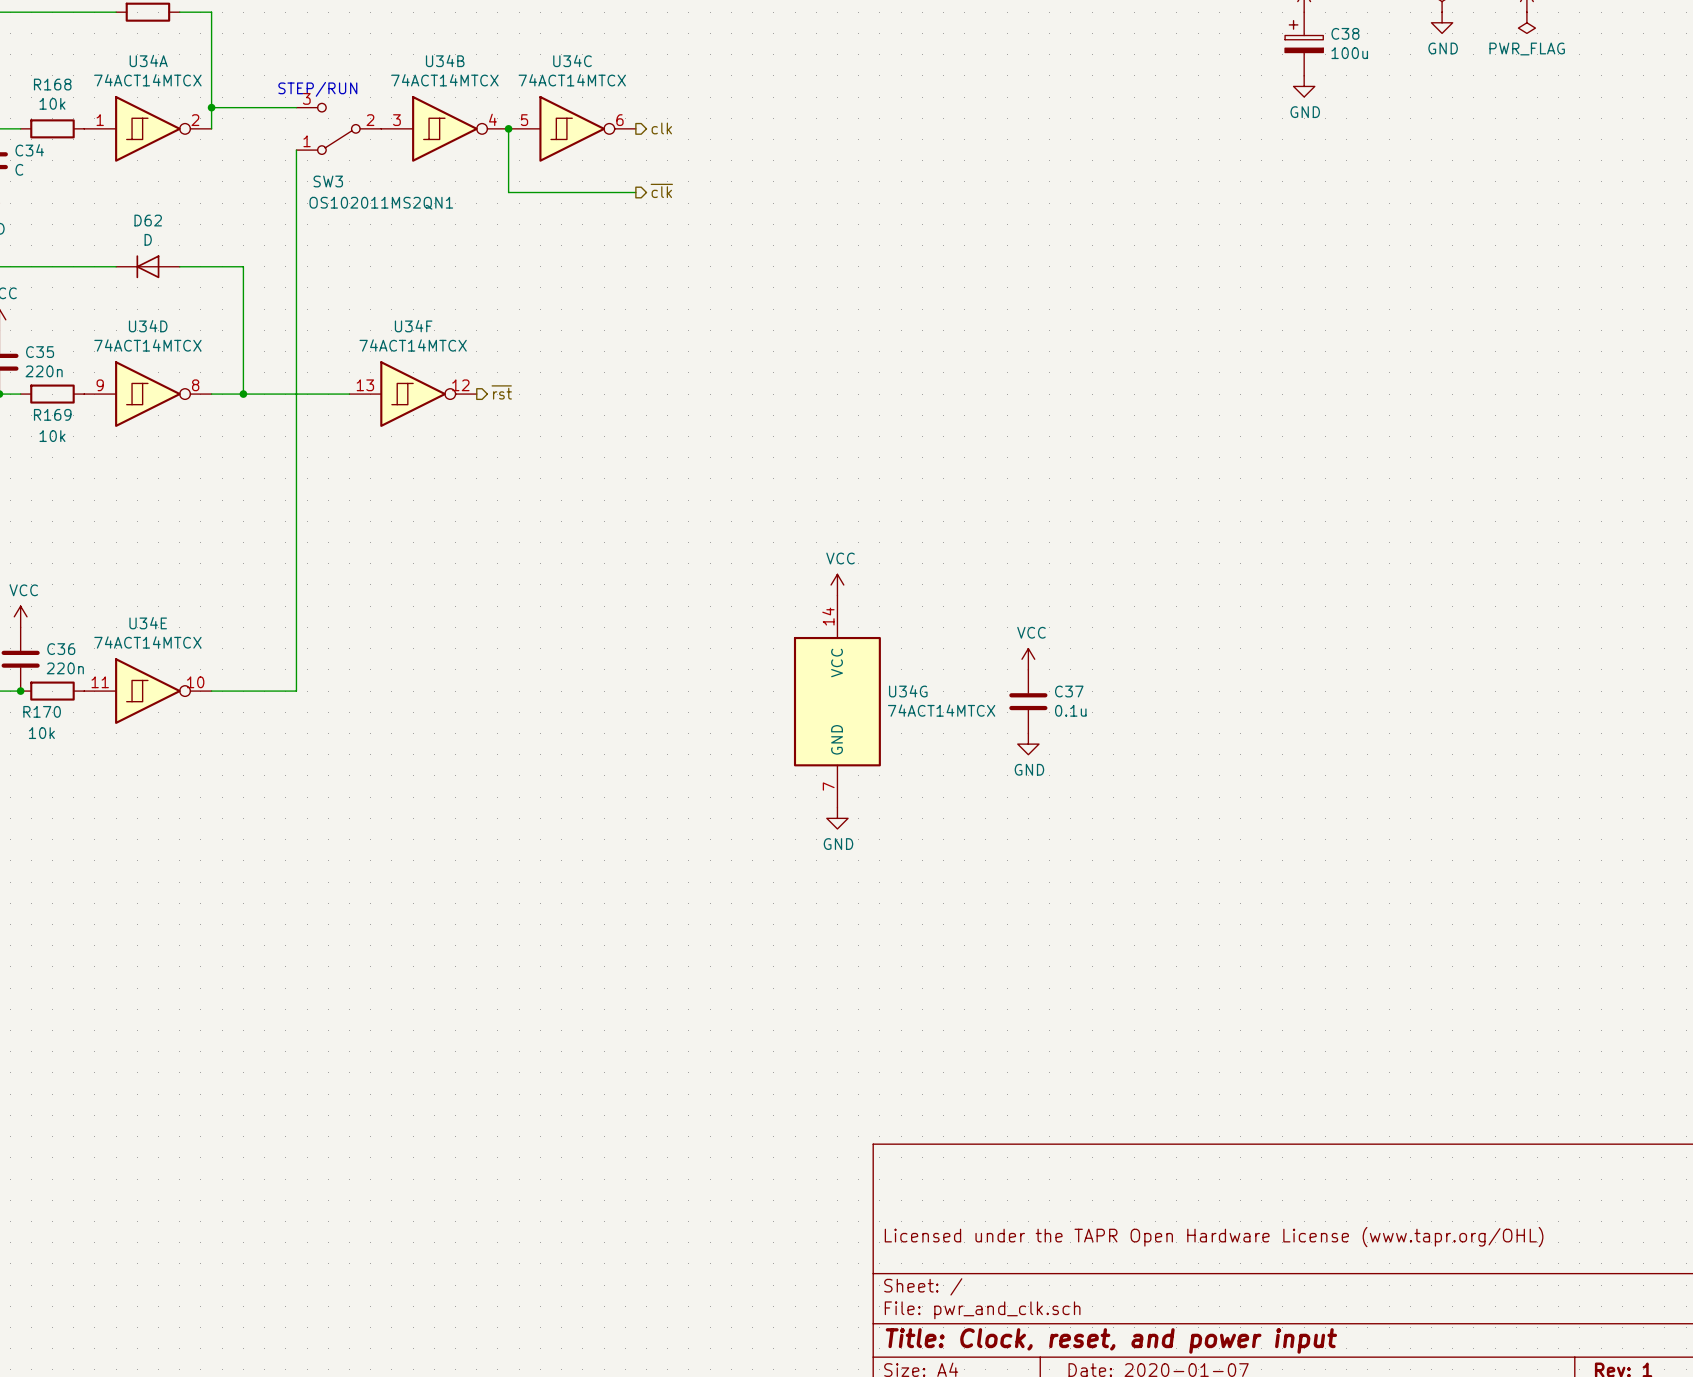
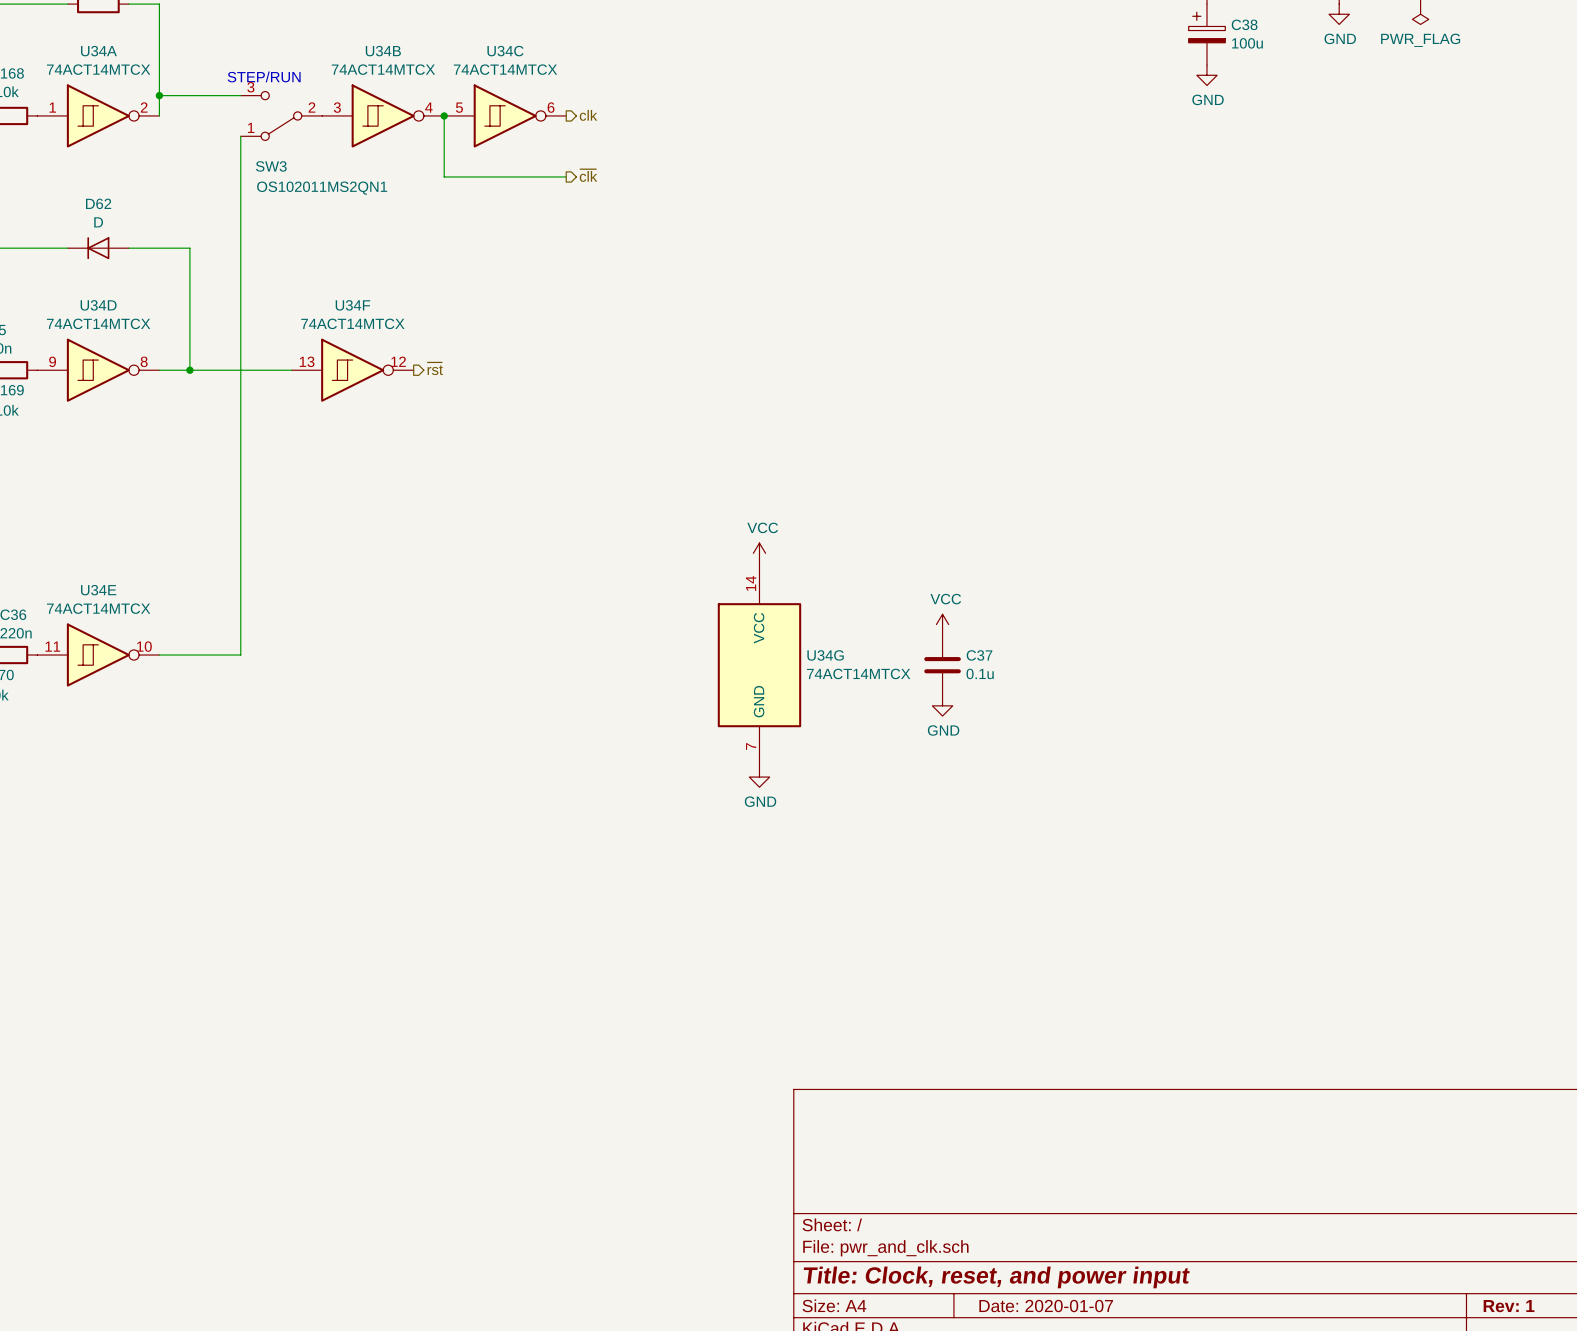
title block: Licensed under the TAPR Open Hardware License (www.tapr.org/OHL) (1214, 1237) -> none

